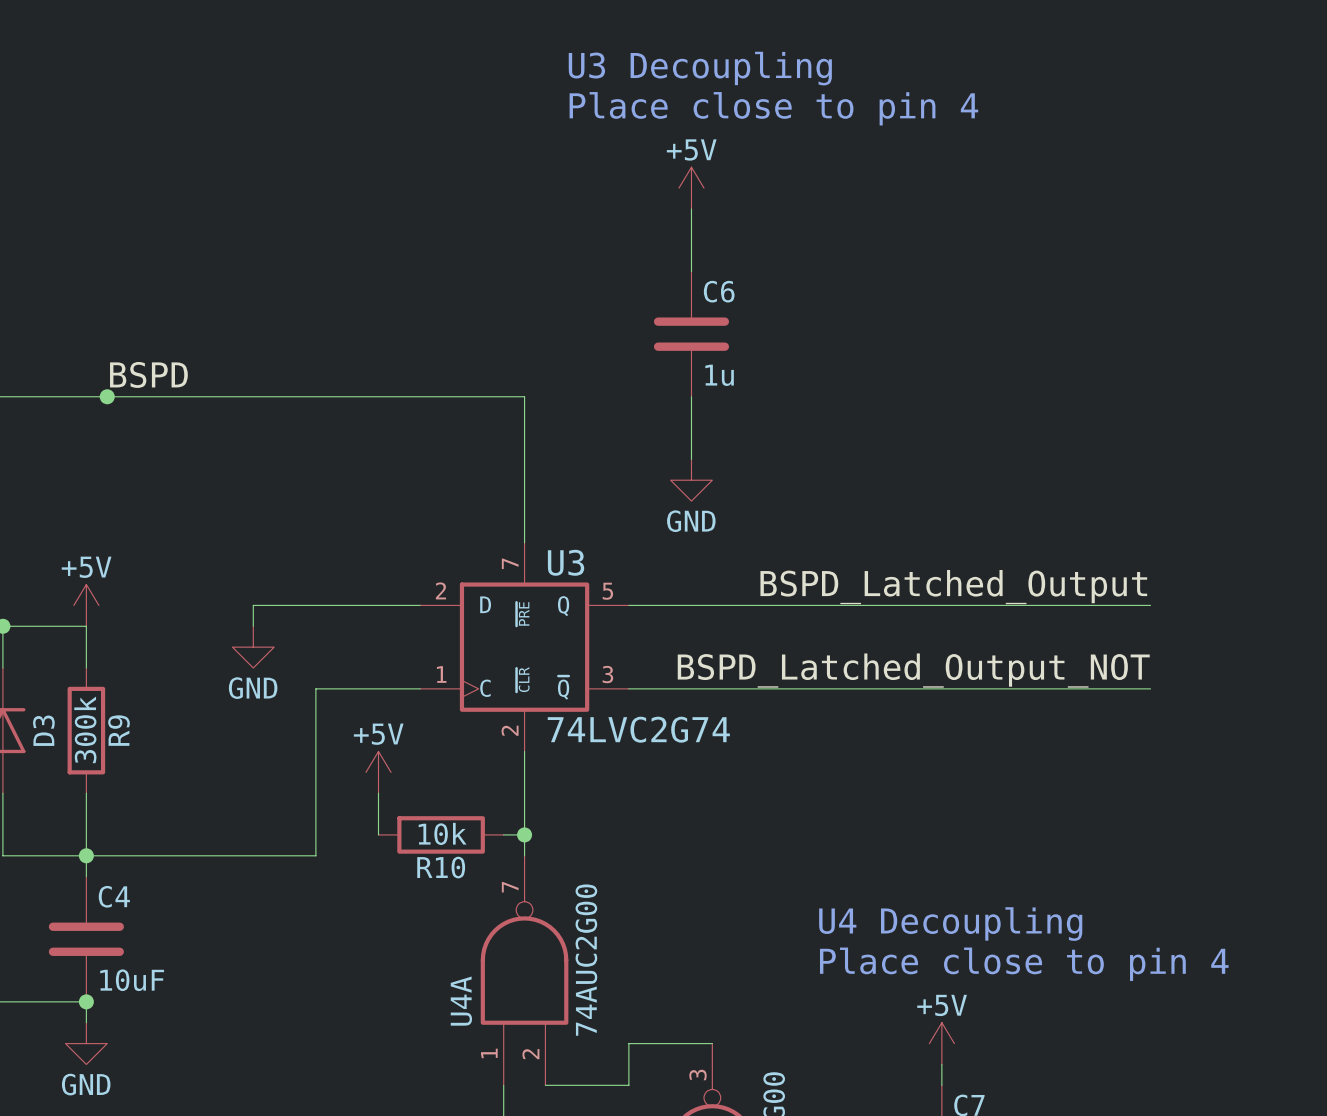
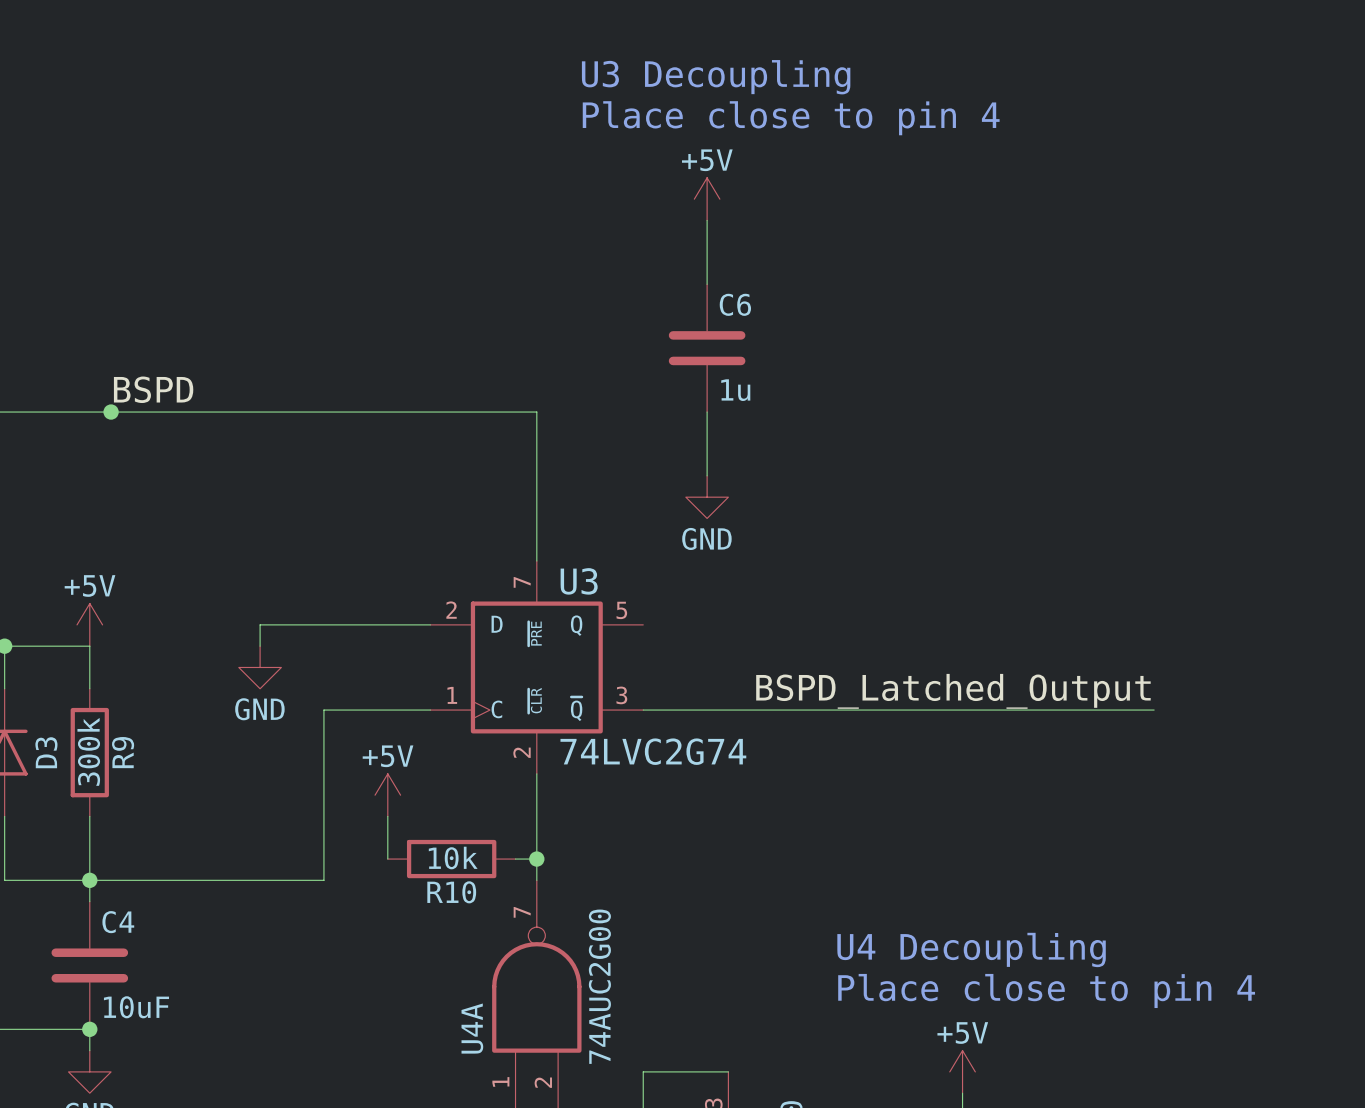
label position: BSPD_Latched_Output (953, 587) -> BSPD_Latched_Output (953, 691)
wire: (628, 605) (1150, 605) -> none
label: BSPD_Latched_Output_NOT (913, 670) -> none
wire: (1129, 688) (1150, 688) -> none

